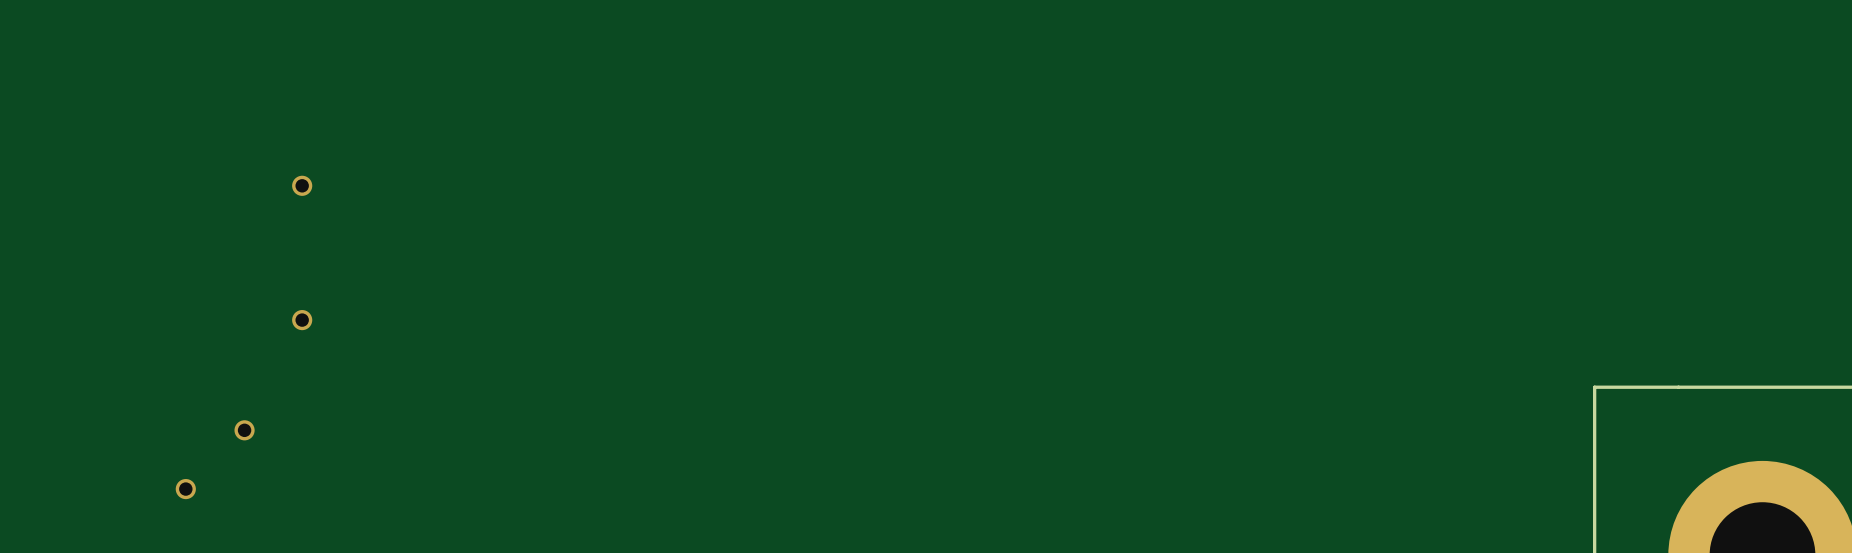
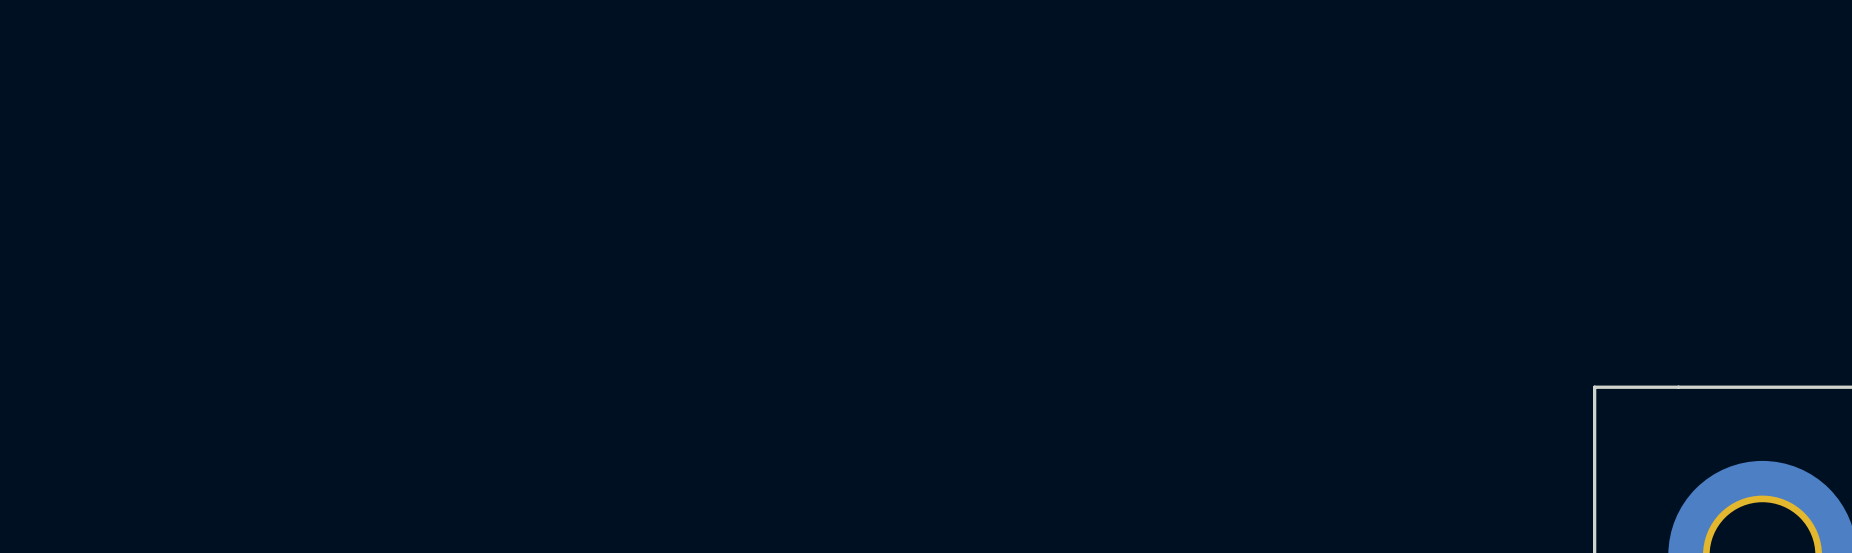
via: (302, 185) -> none
via: (302, 320) -> none
via: (244, 430) -> none
via: (185, 489) -> none

